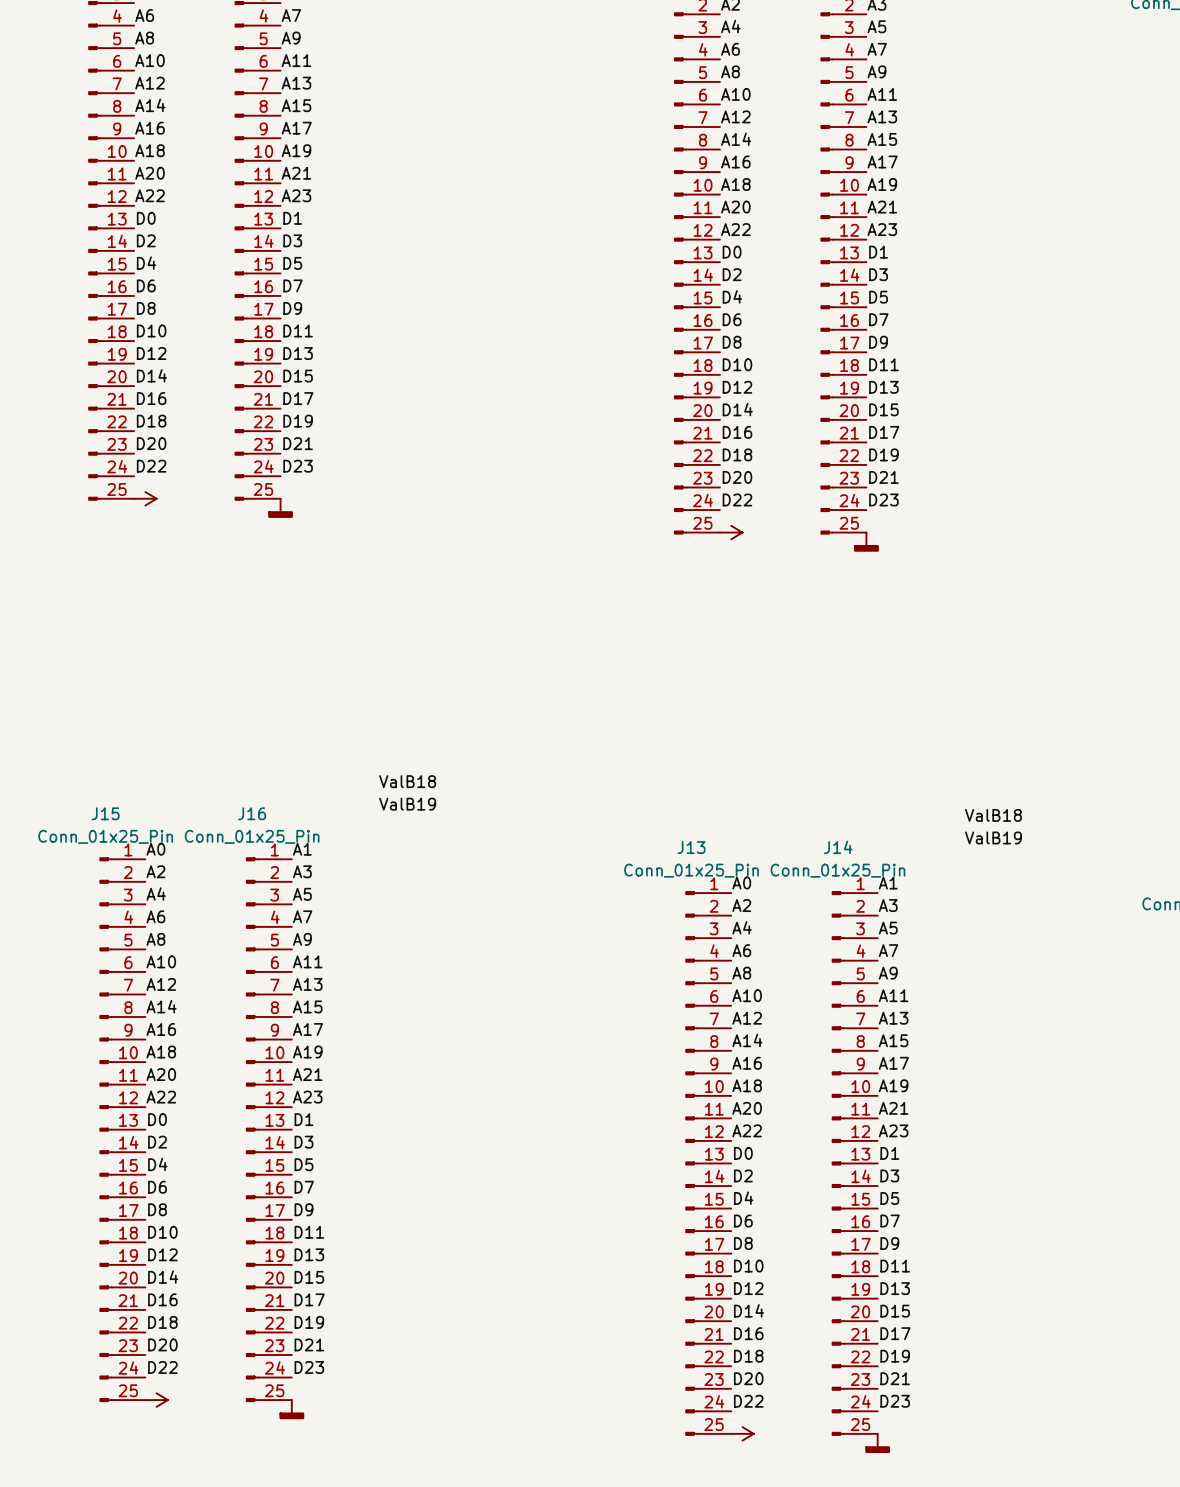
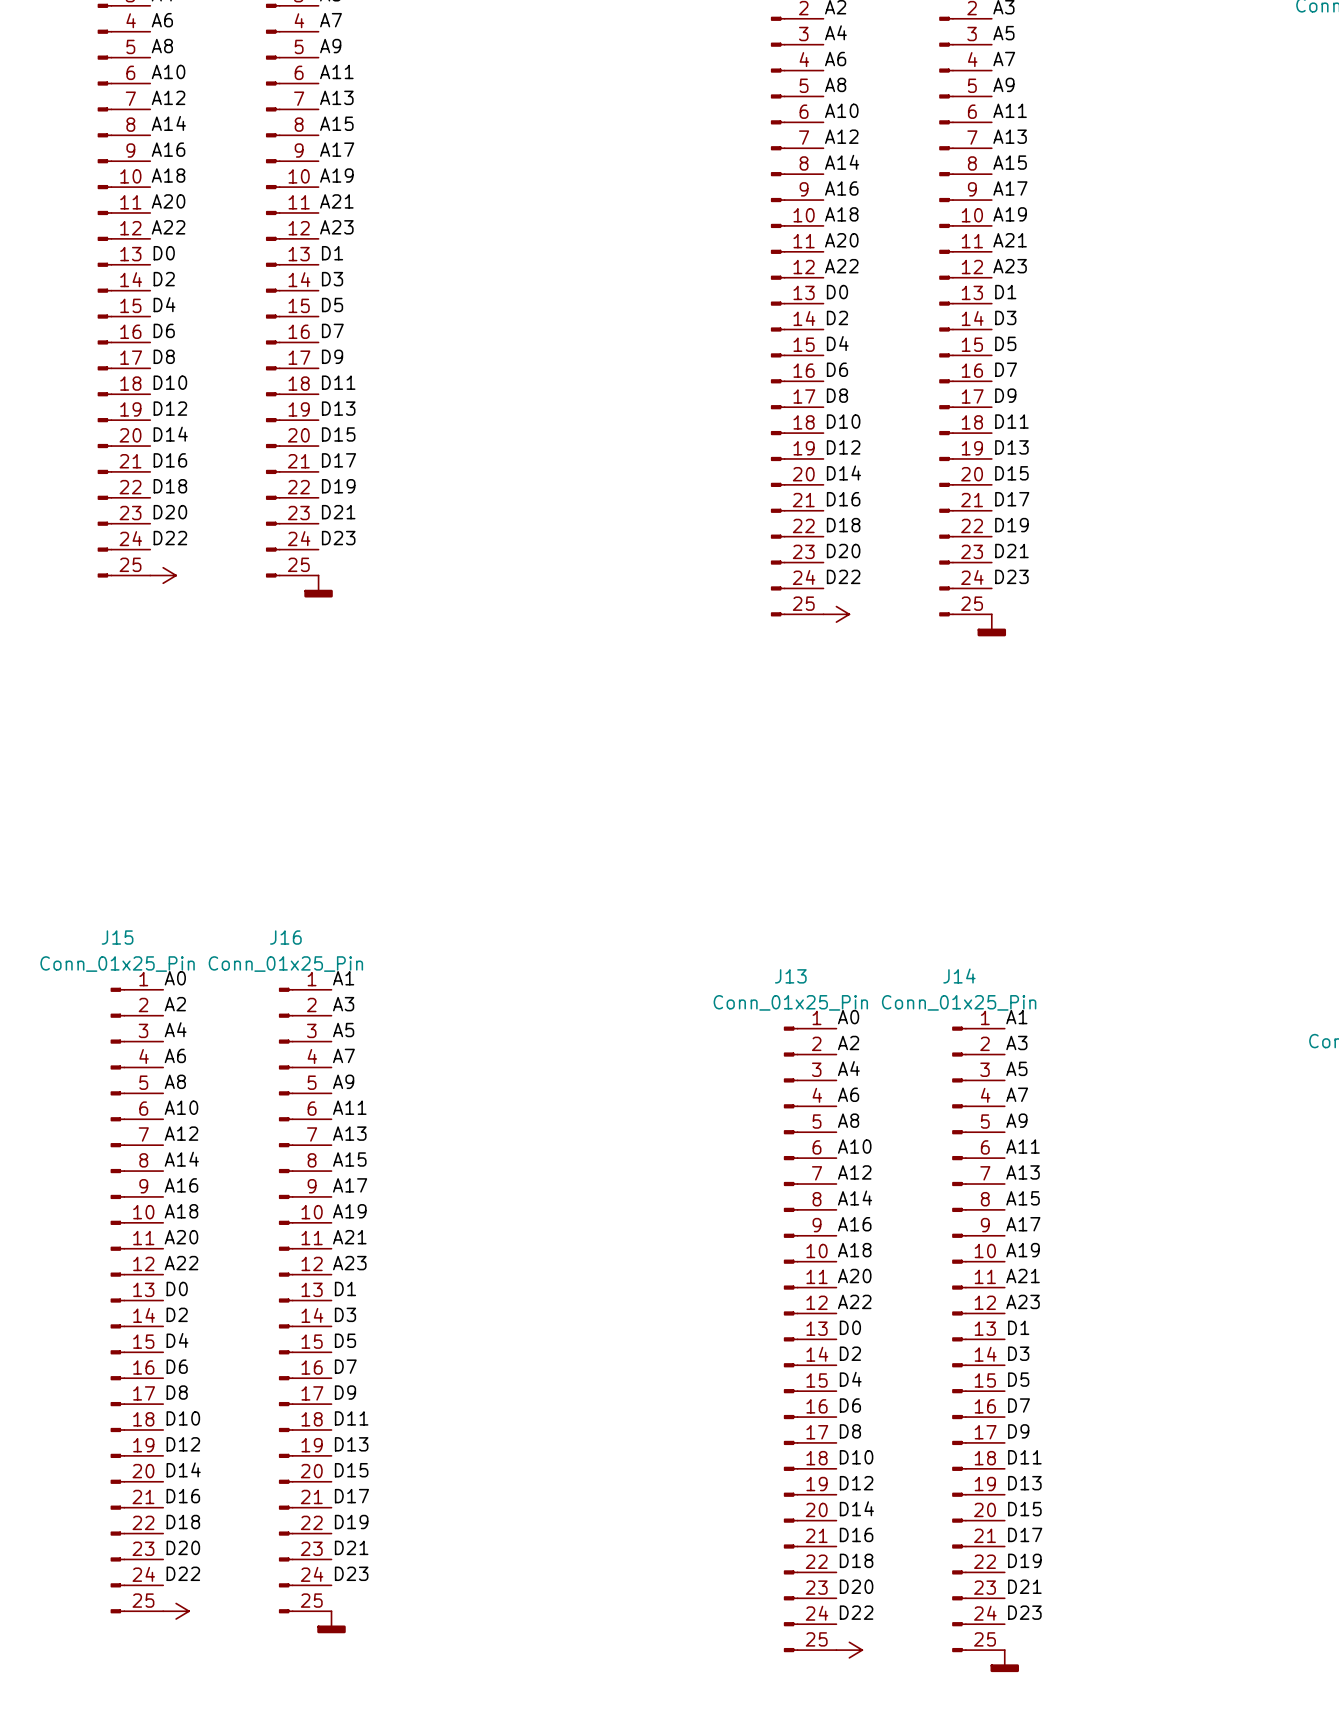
label: ValB18 (407, 781) -> none
label: ValB19 (407, 804) -> none
label: ValB18 (993, 815) -> none
label: ValB19 (993, 837) -> none

